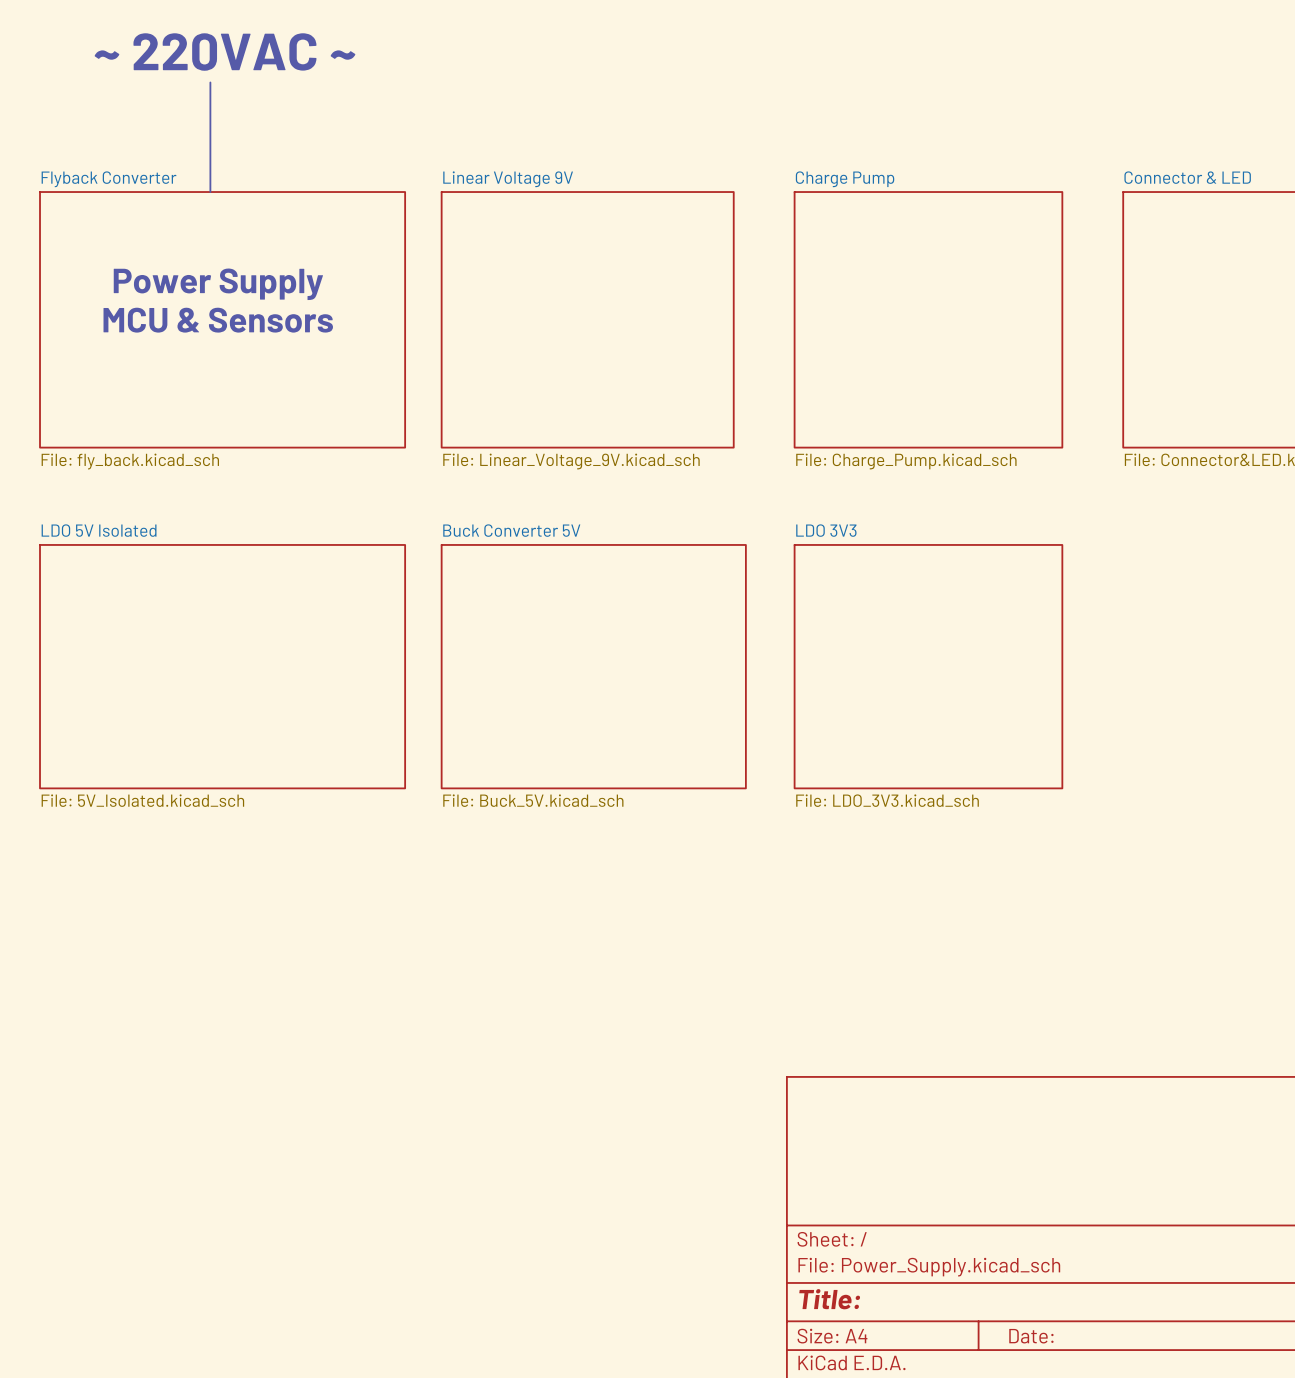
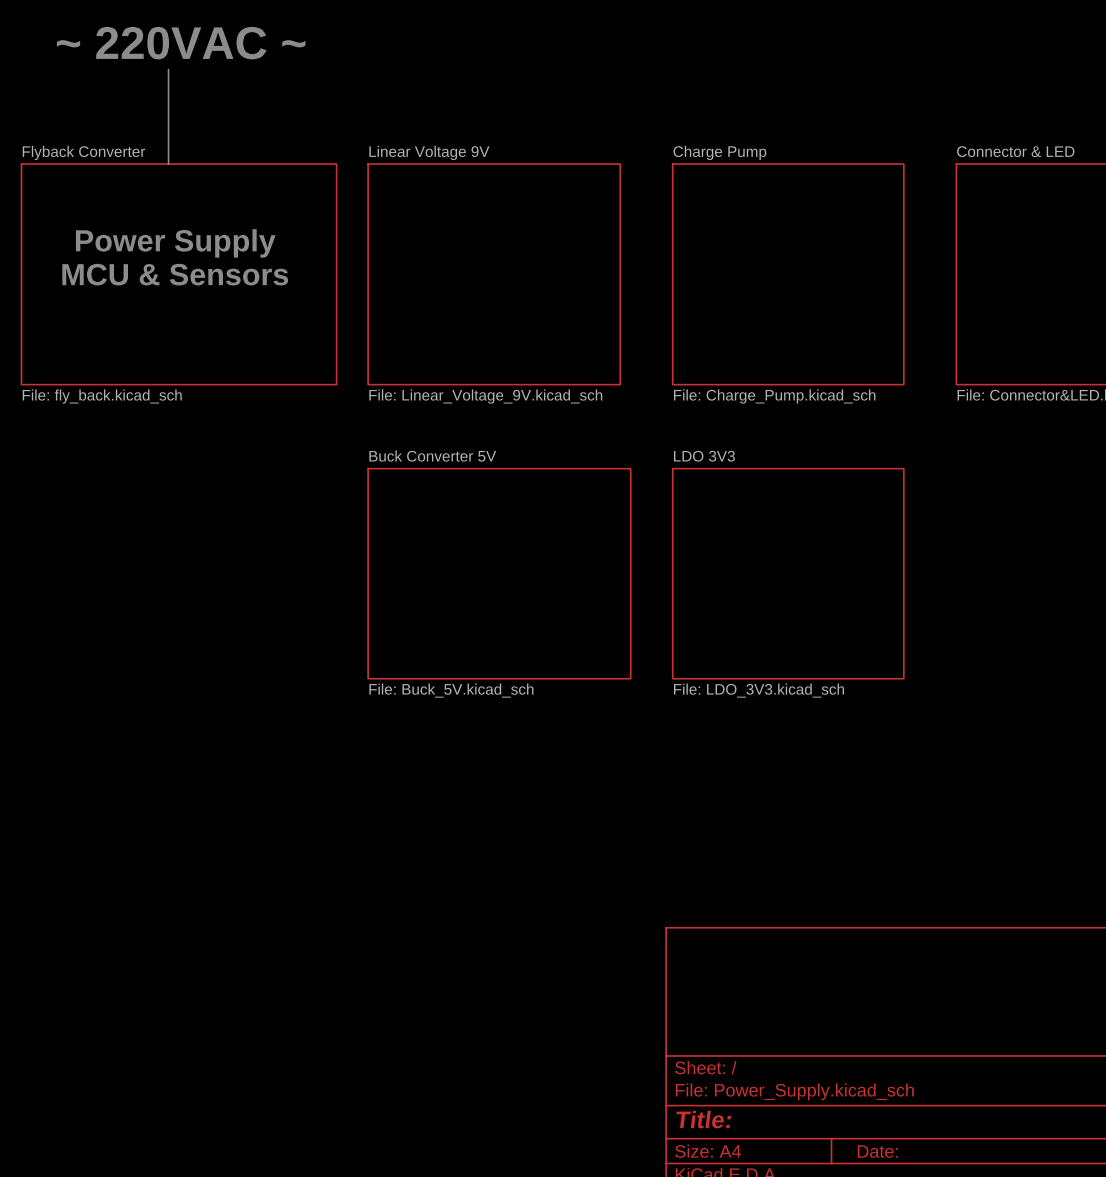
sheet LDO 5V Isolated: File: 5V_Isolated.kicad_sch (222, 666) -> none

